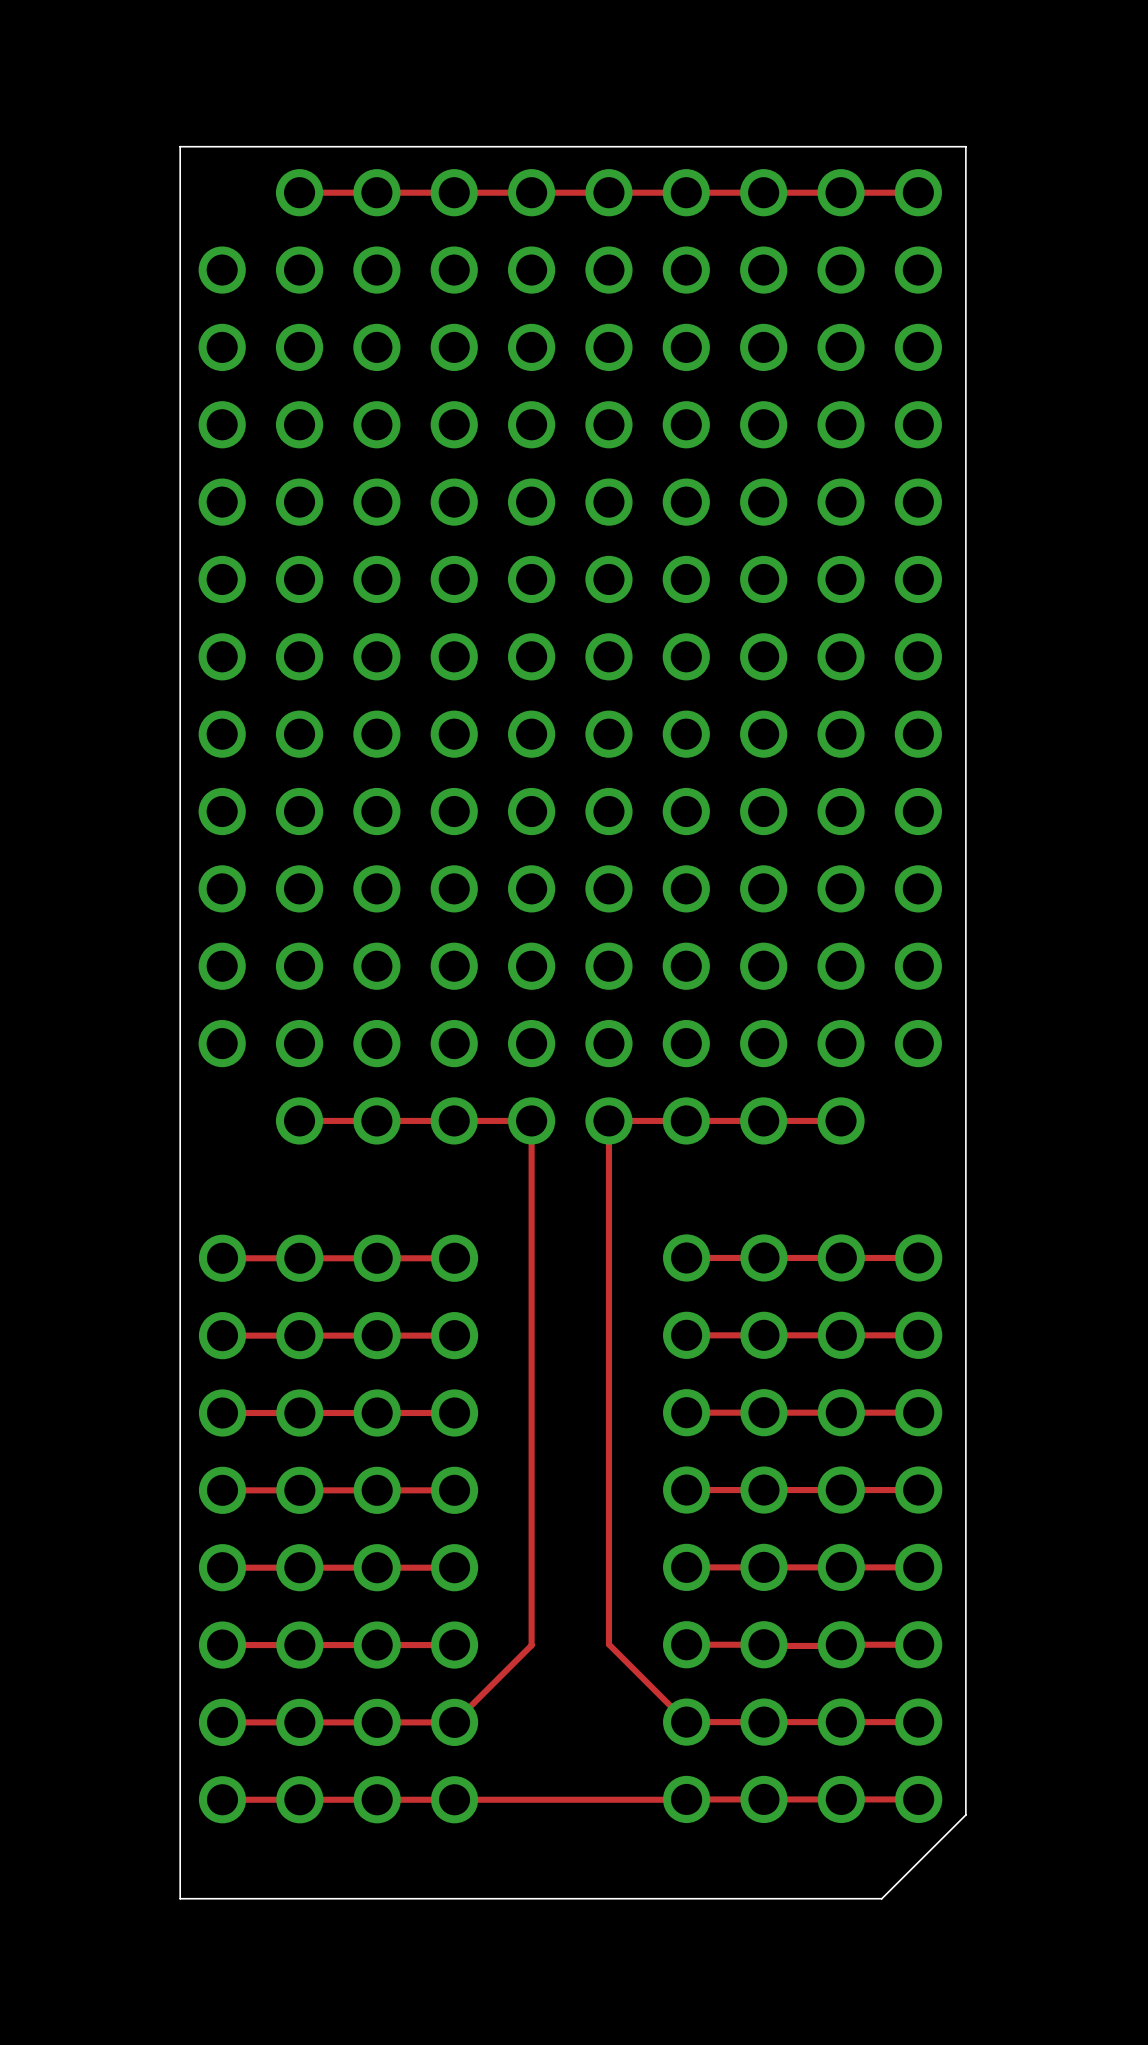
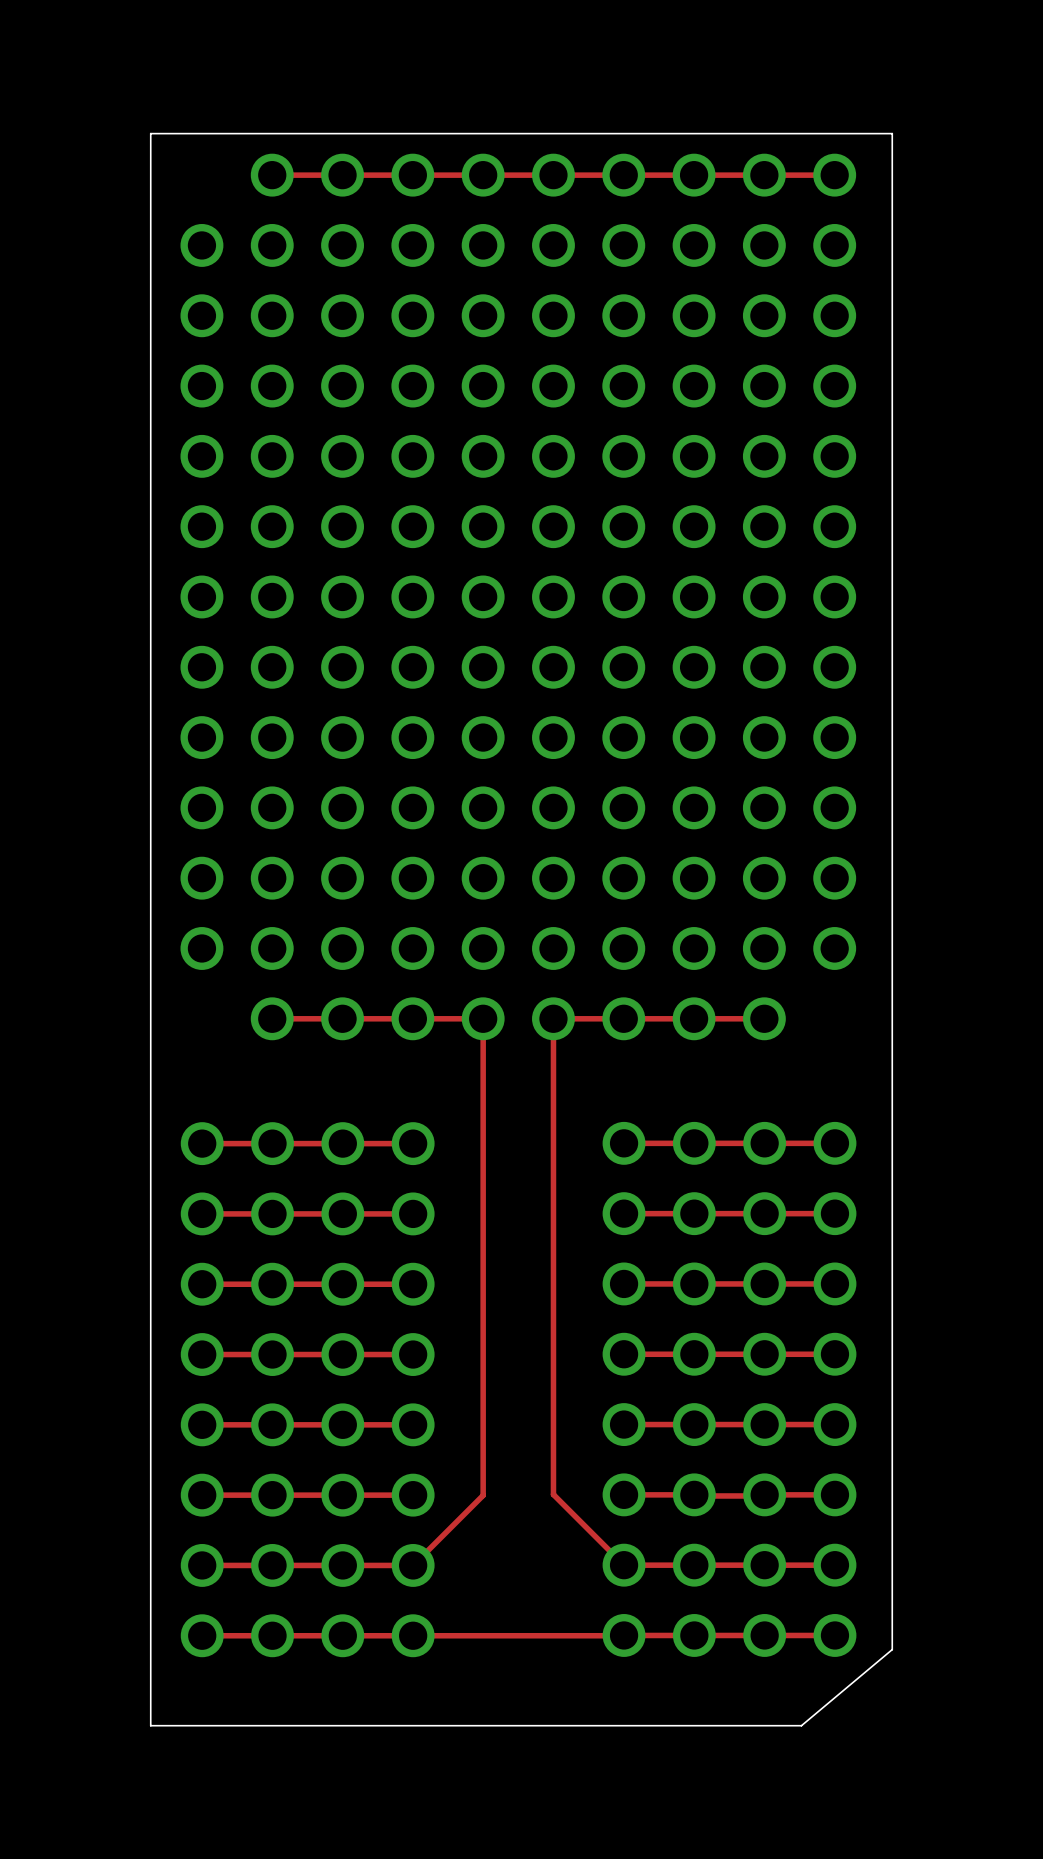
board edge: (180, 1898) (180, 146) (965, 146) (965, 1814) (881, 1898) -> (163, 1725) (150, 1725) (150, 133) (892, 133) (892, 1649) (801, 1725)

